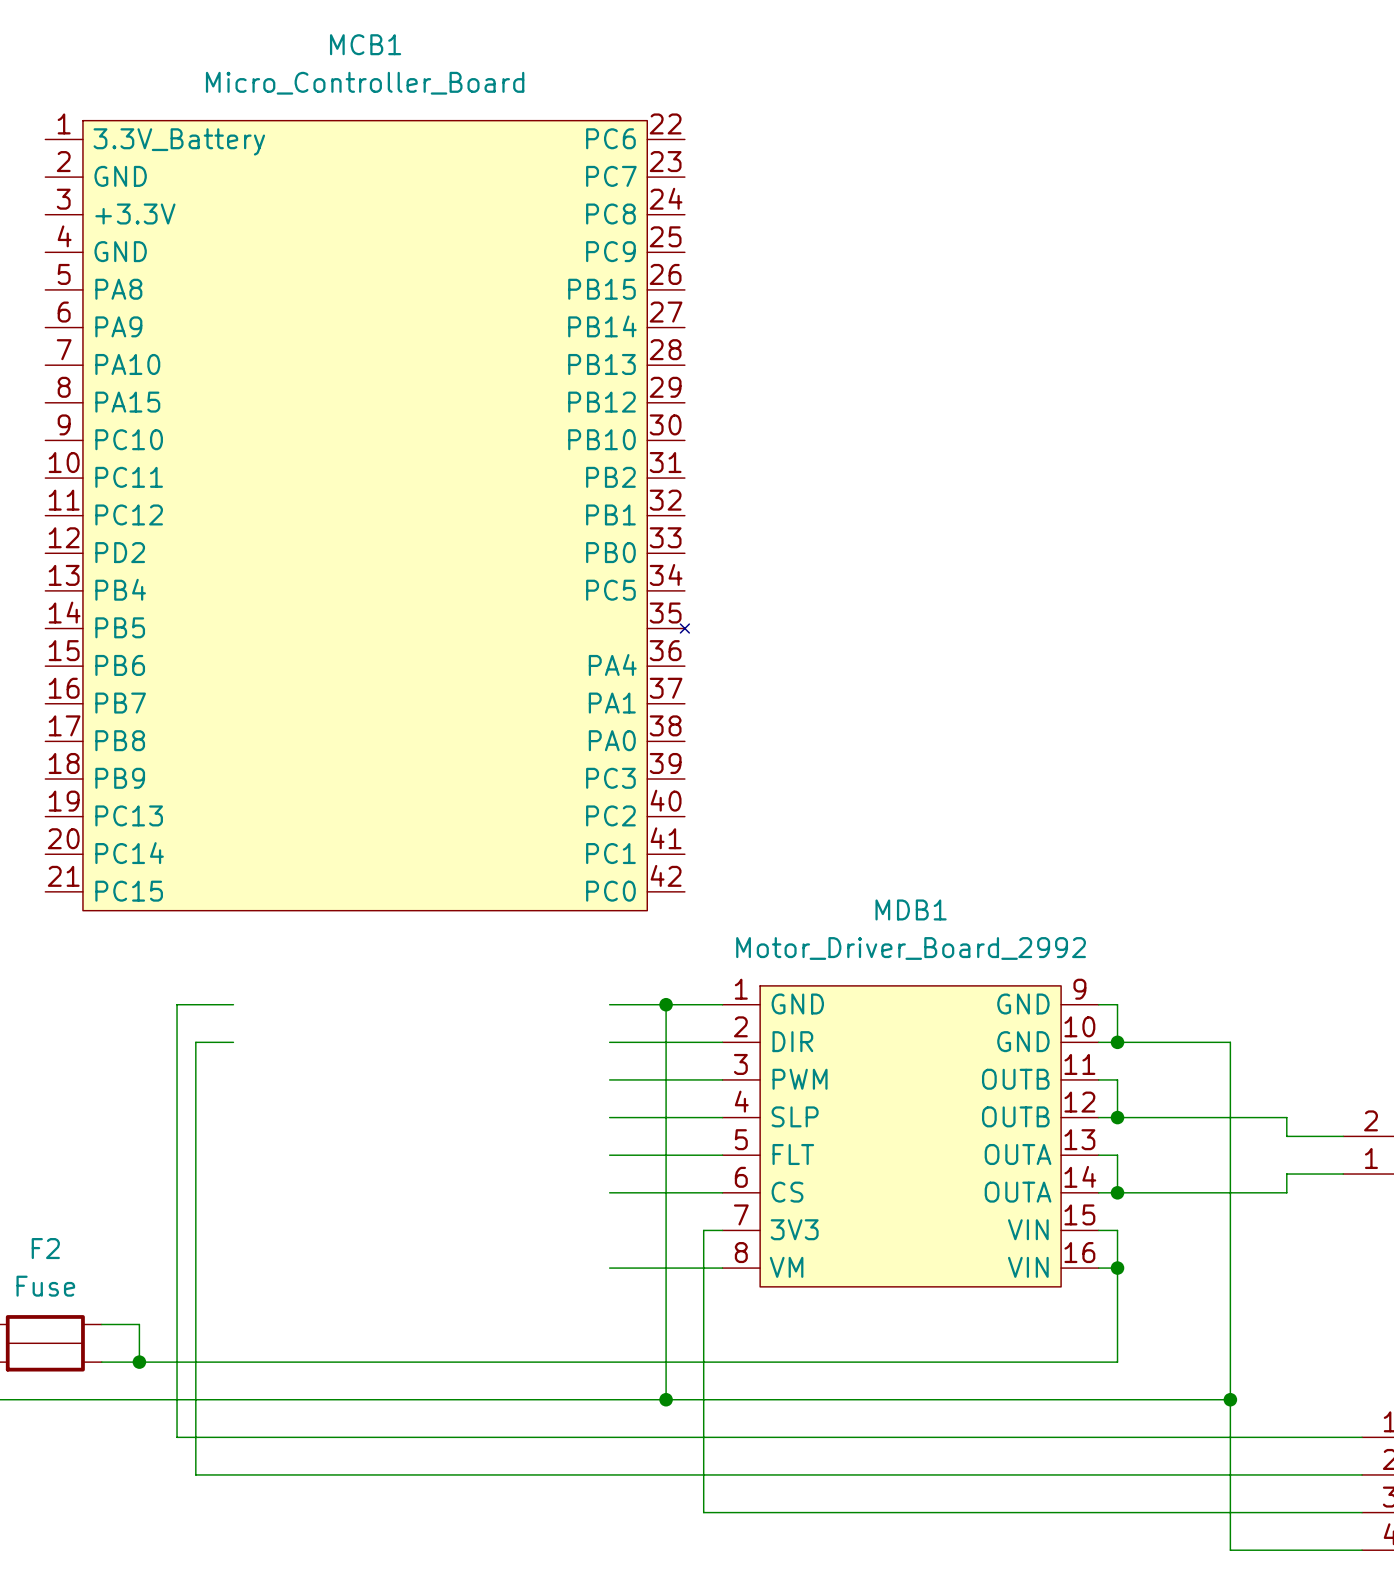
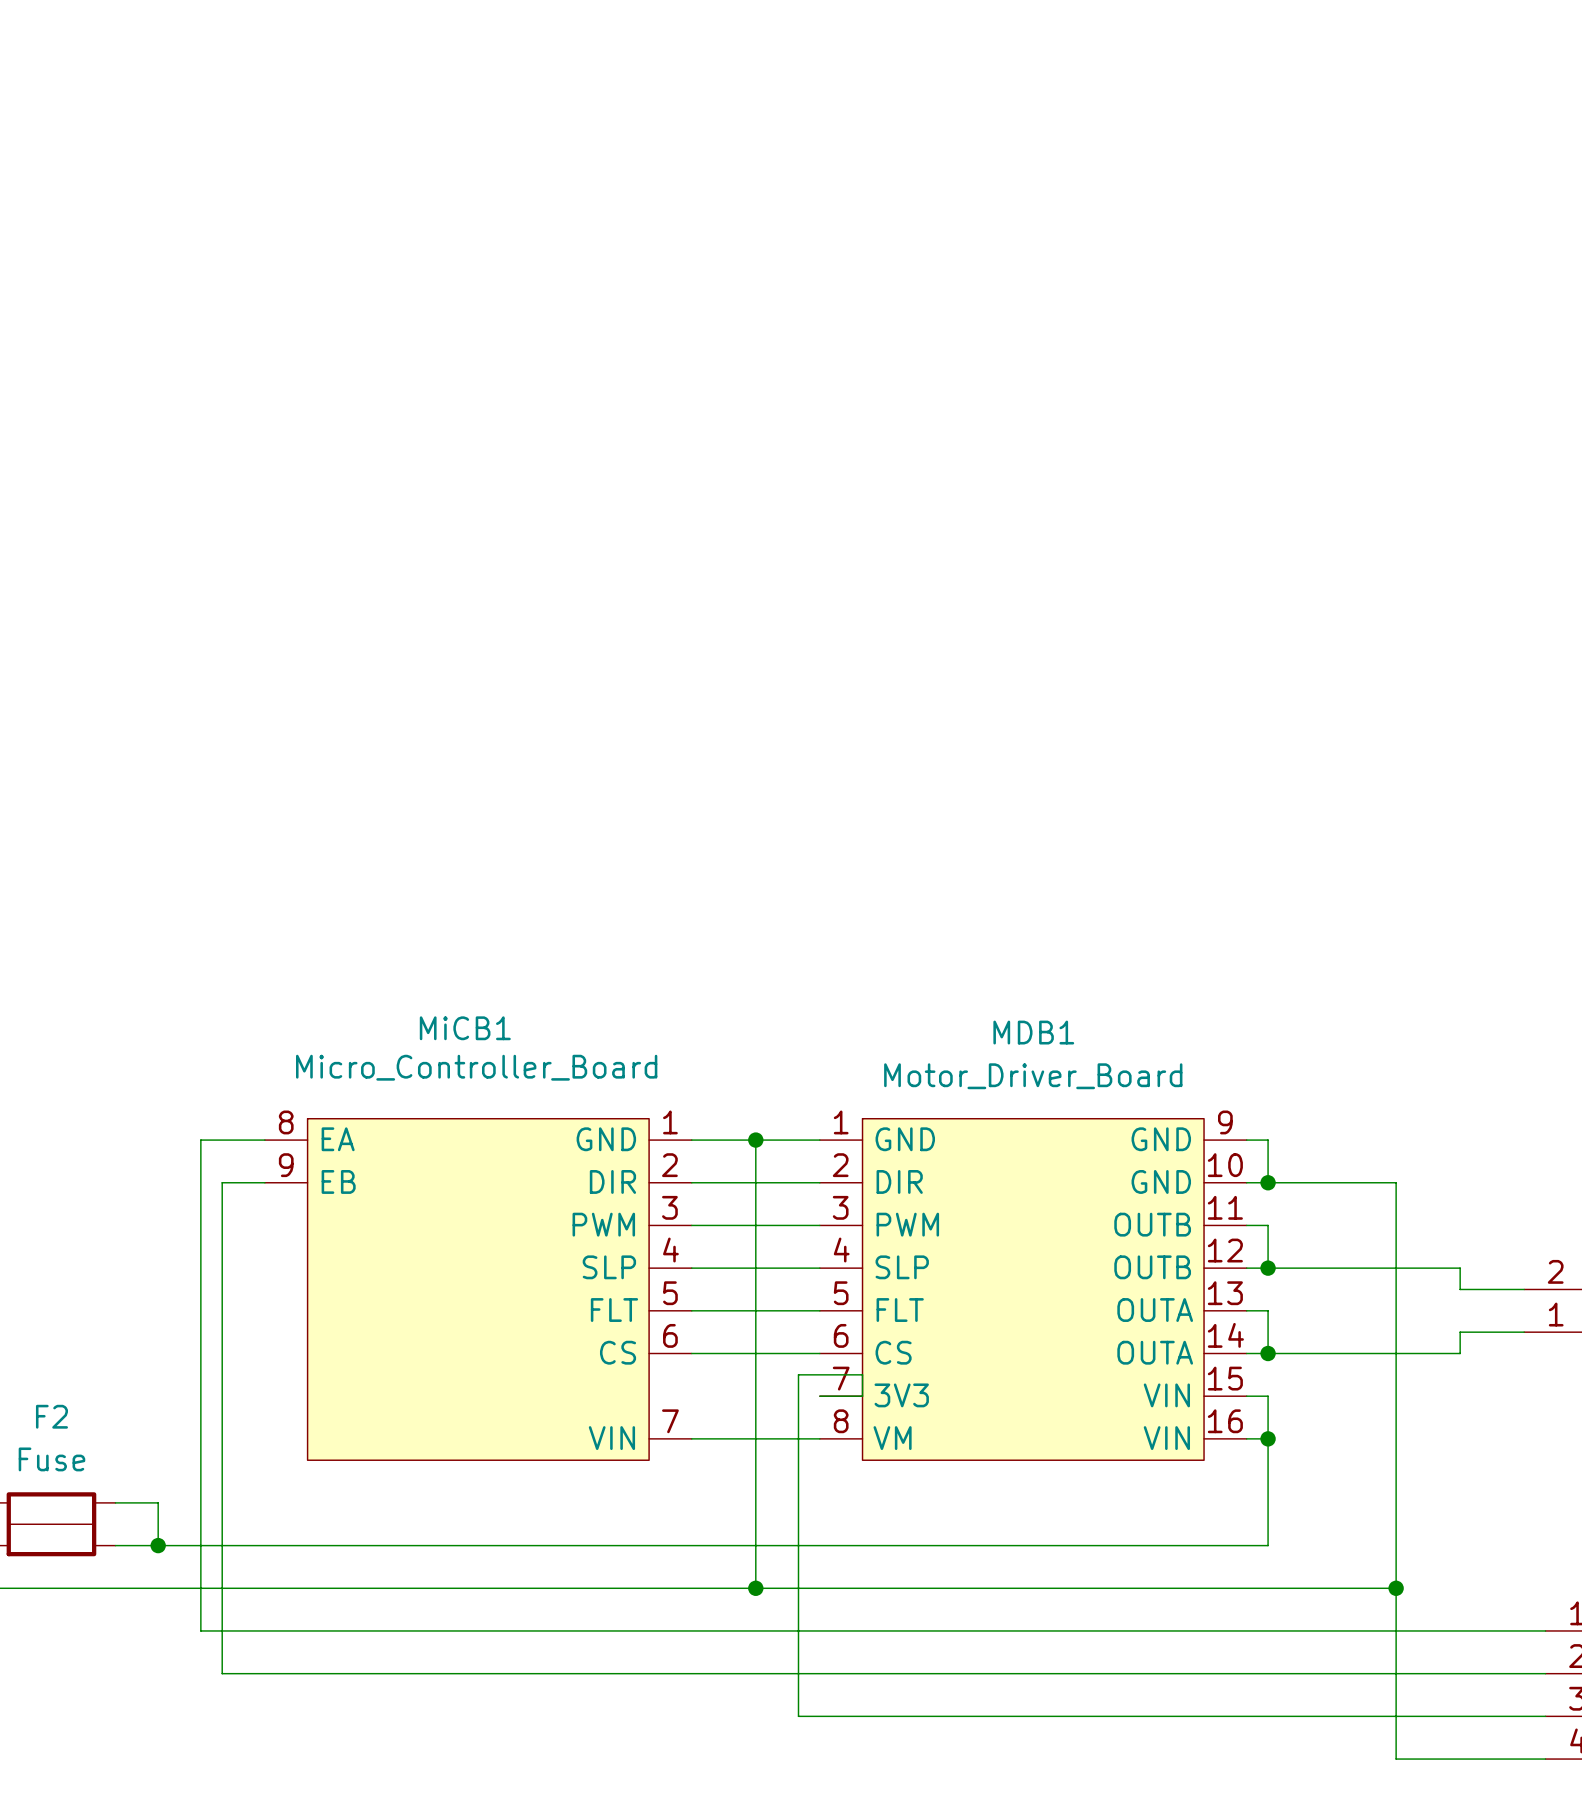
MCB1: Micro_Controller_Board (367, 515) -> none
MDB1 value: Motor_Driver_Board_2992 (911, 948) -> Motor_Driver_Board (1033, 1076)
MiCB1: none -> Micro_Controller_Board (478, 1289)
wire: (703, 1230) (722, 1230) -> (798, 1396) (798, 1374) (862, 1374) (862, 1396) (819, 1396)

